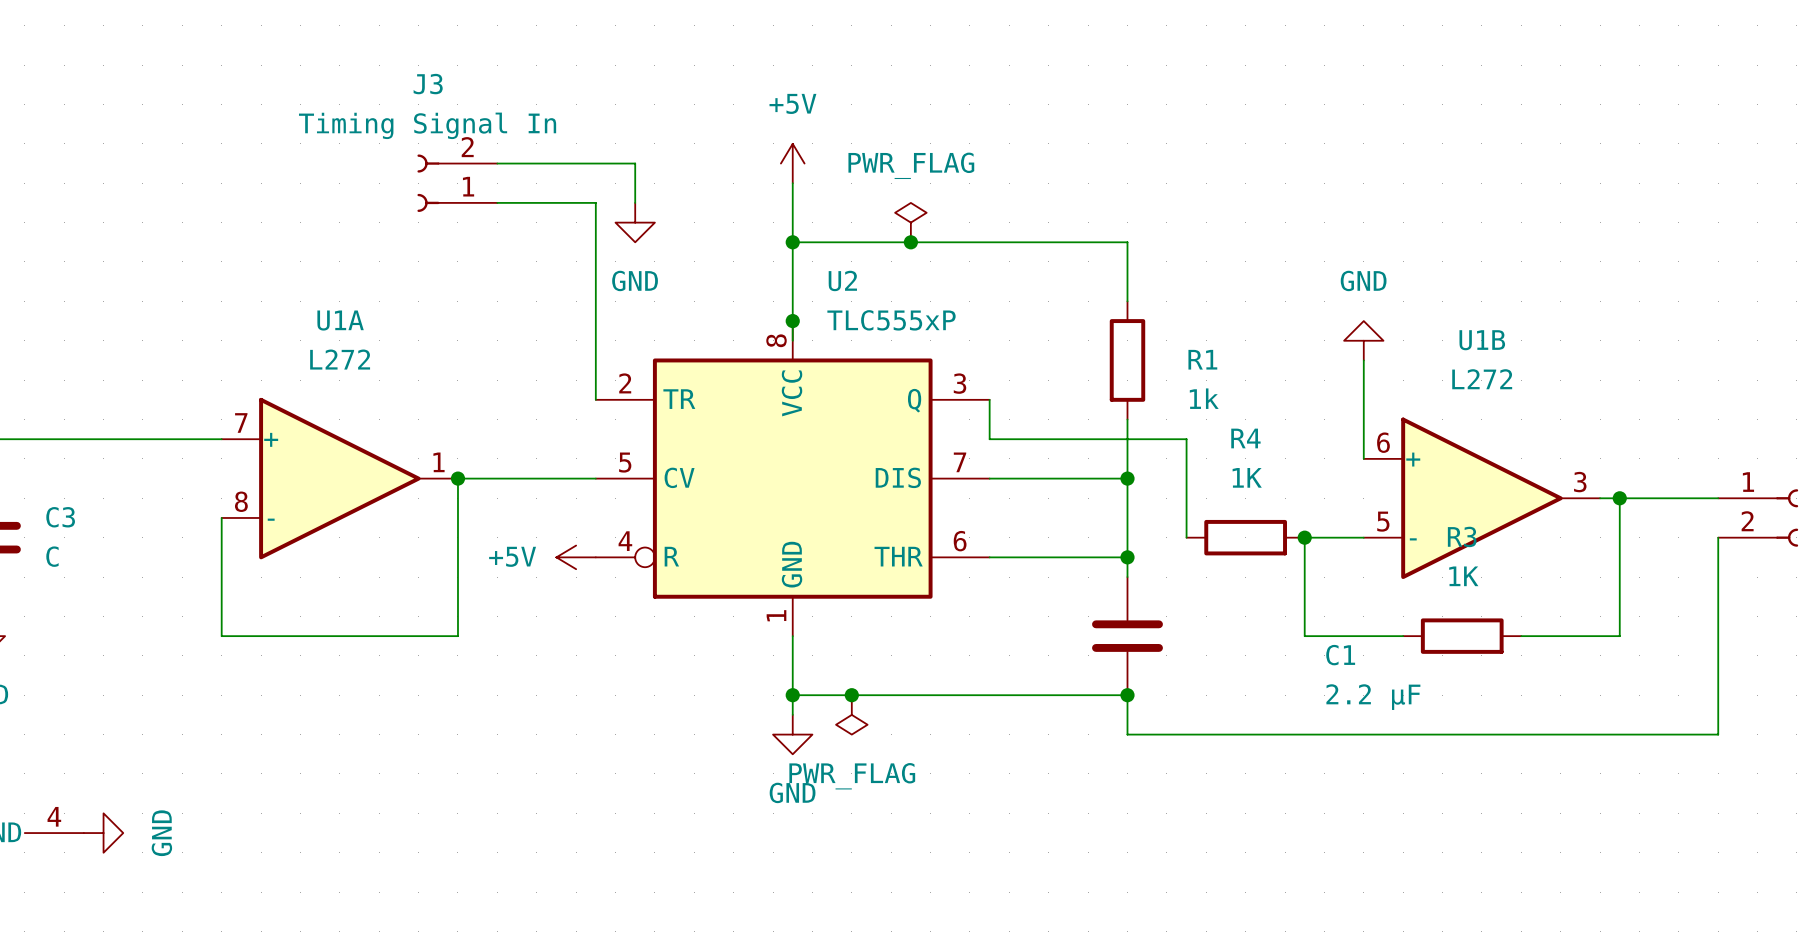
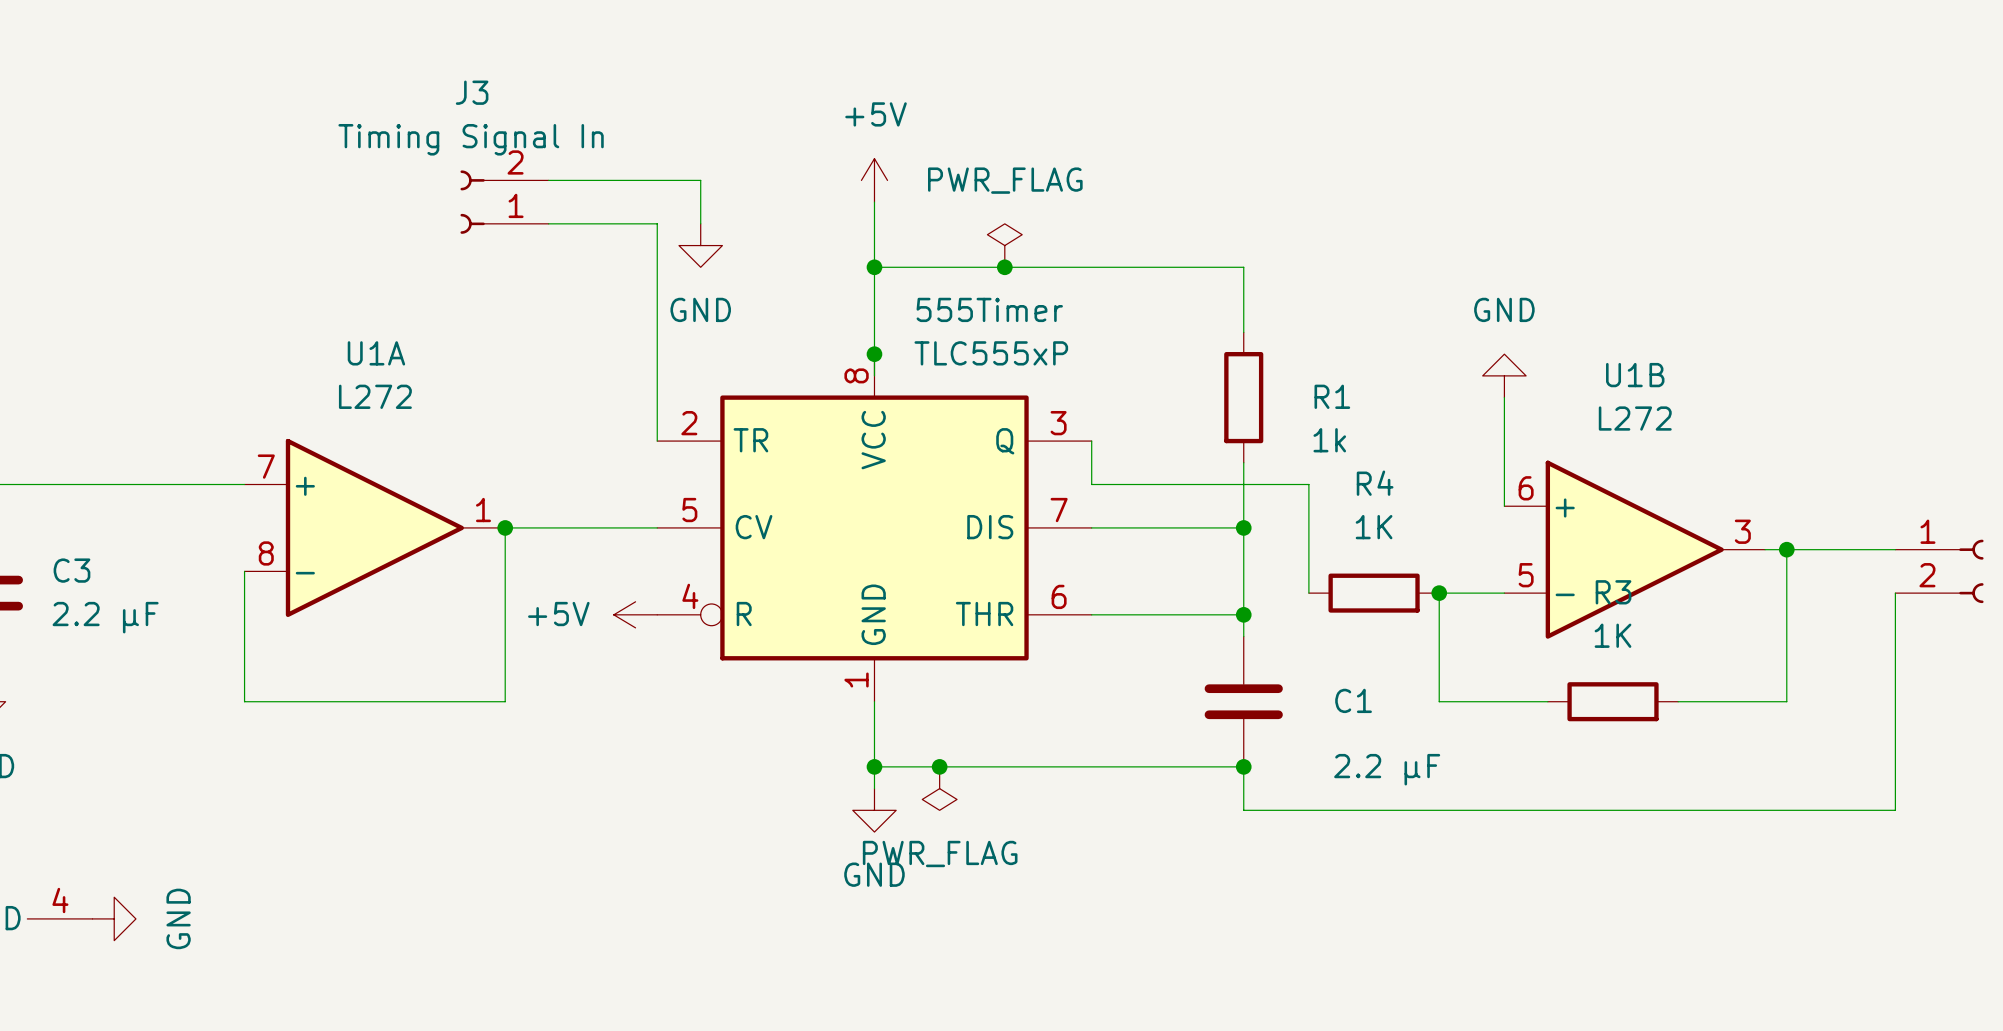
U2 name: U2 (842, 280) -> 555Timer (989, 309)
C3 value: C (52, 556) -> 2.2 μF (105, 617)
C1 name position: C1 (1340, 655) -> C1 (1353, 700)
C1 value position: 2.2 μF (1373, 697) -> 2.2 μF (1387, 769)

